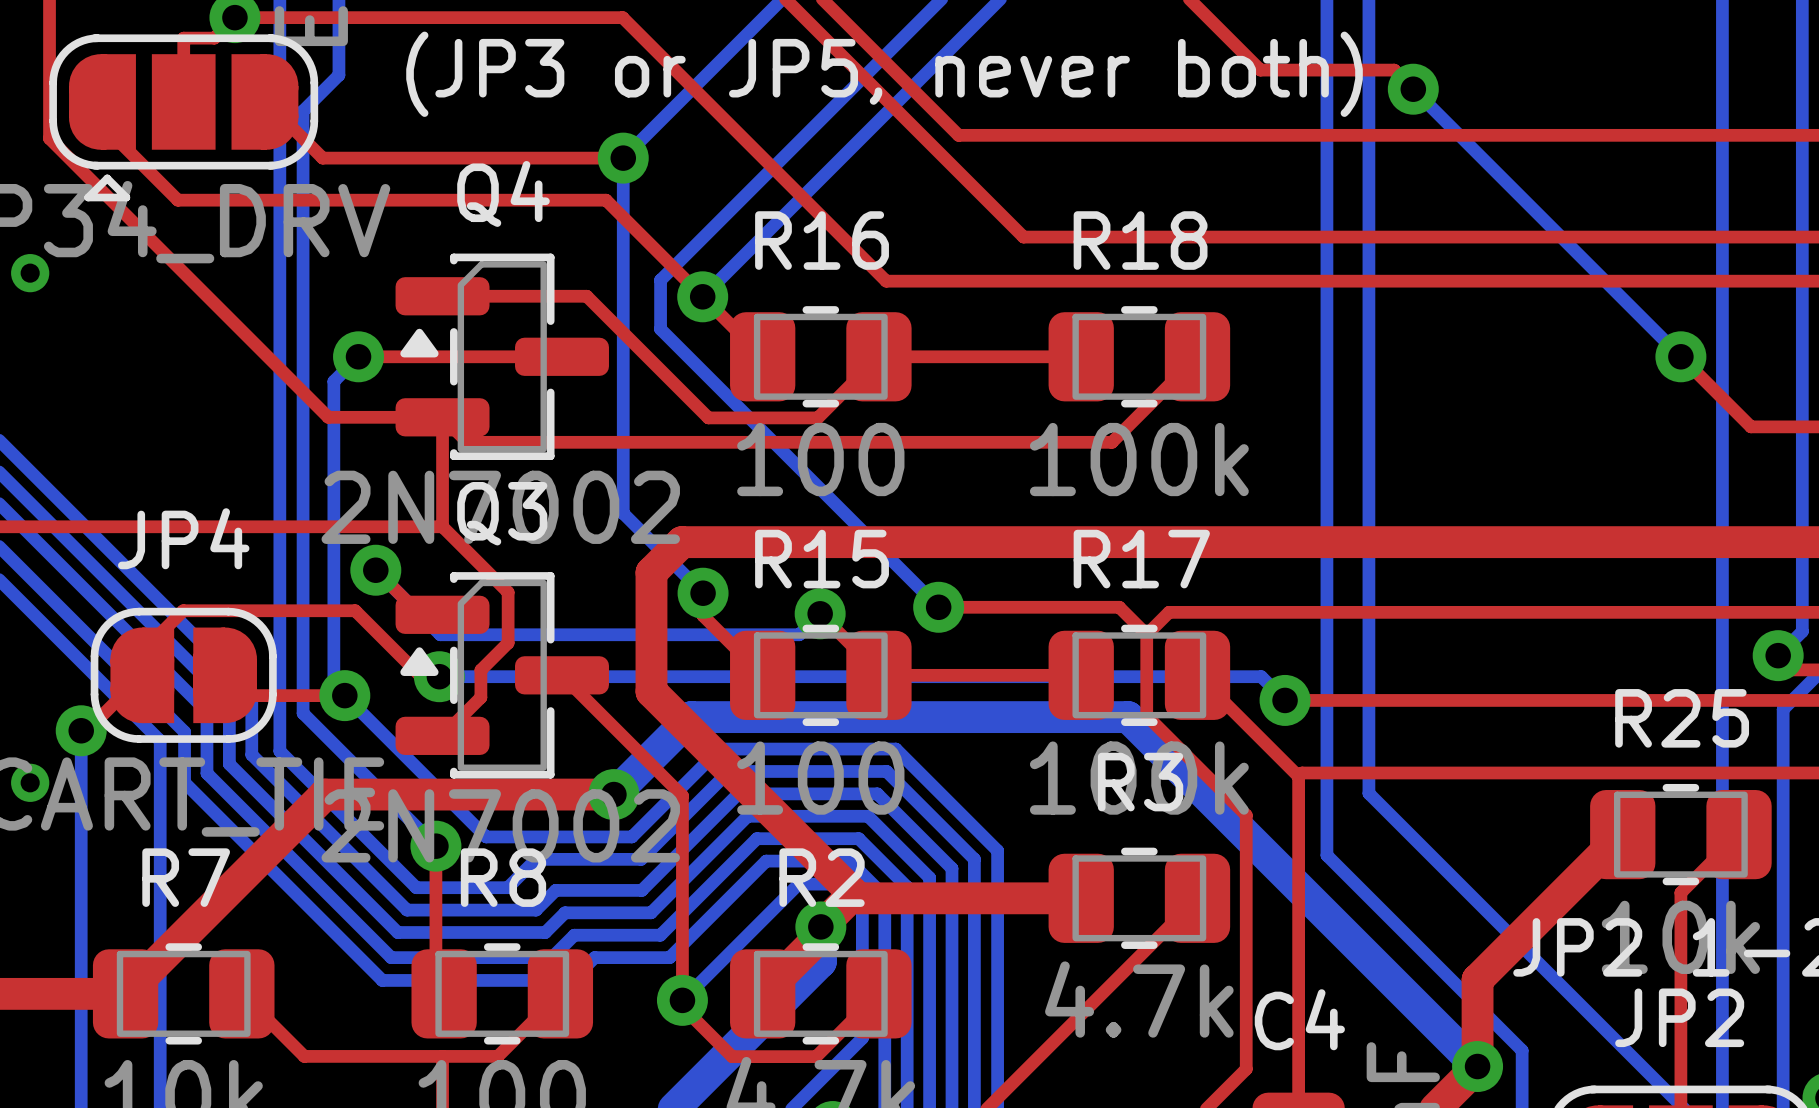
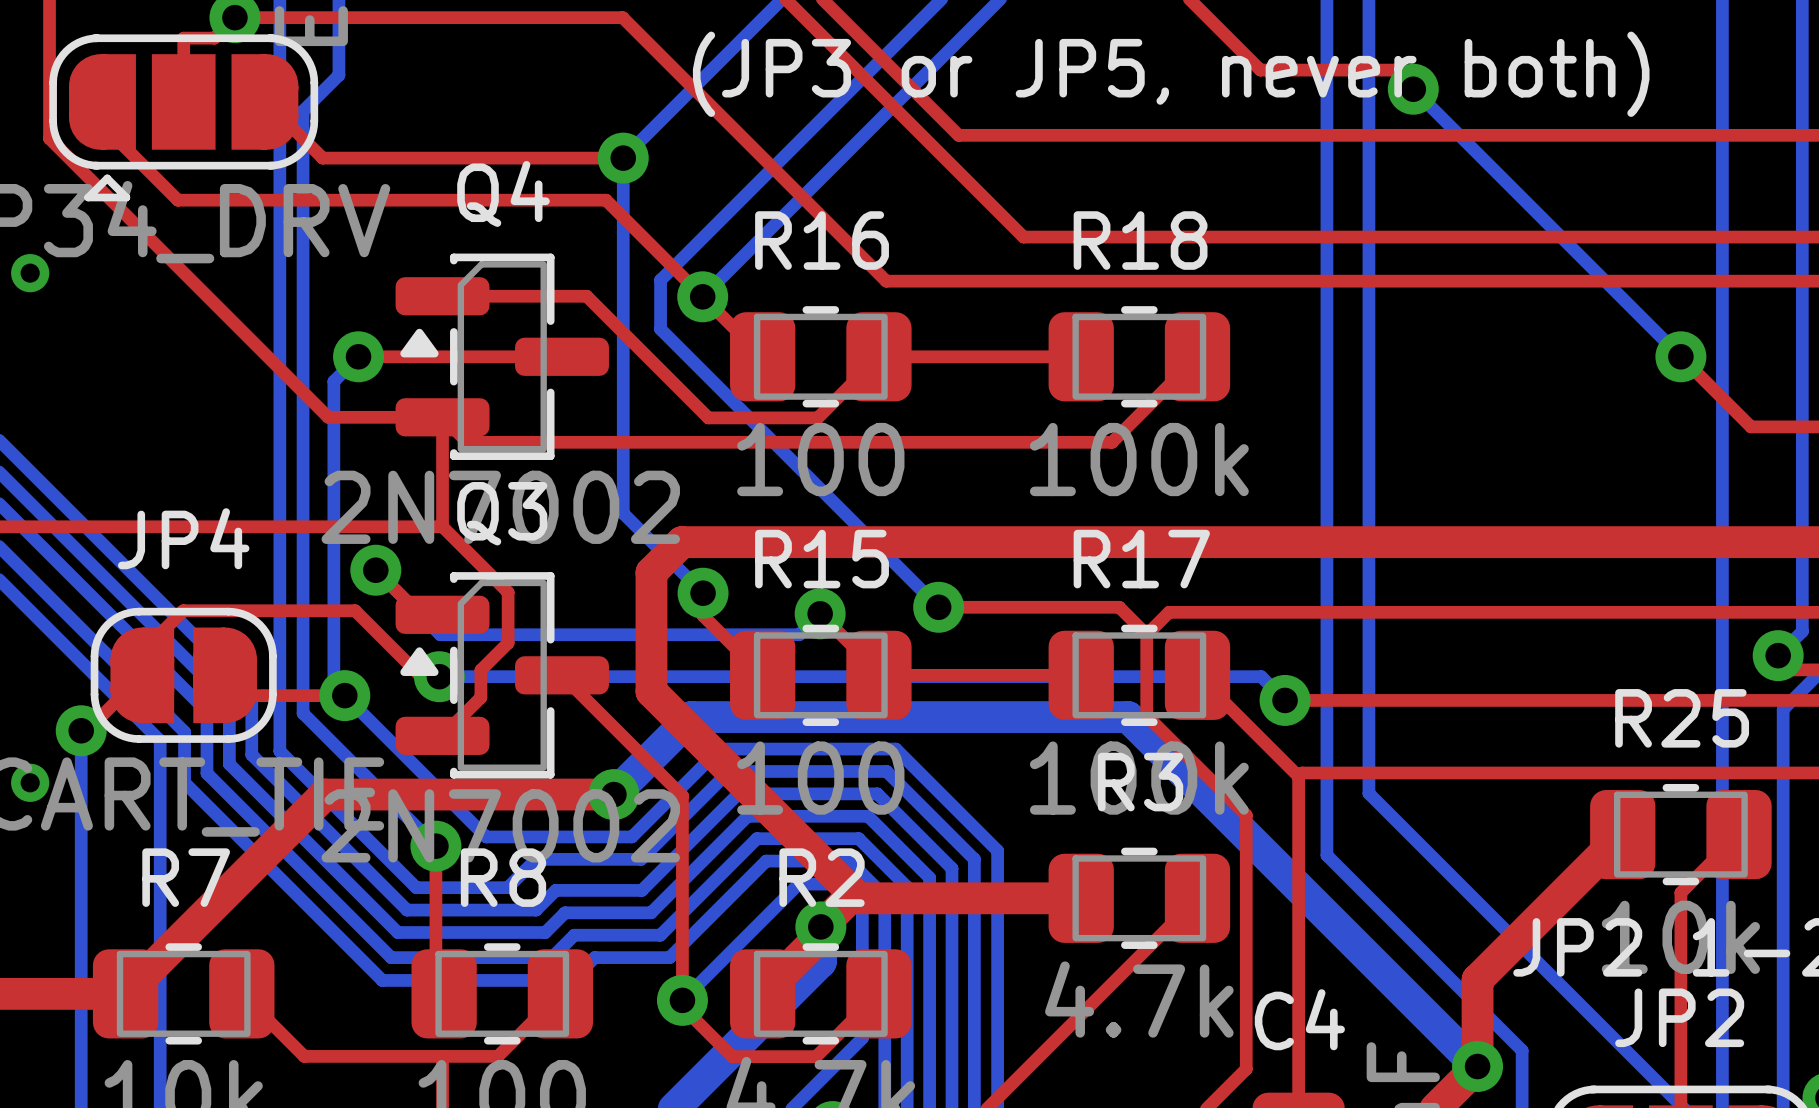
text position: (JP3 or JP5, never both) (884, 74) -> (JP3 or JP5, never both) (1171, 74)

